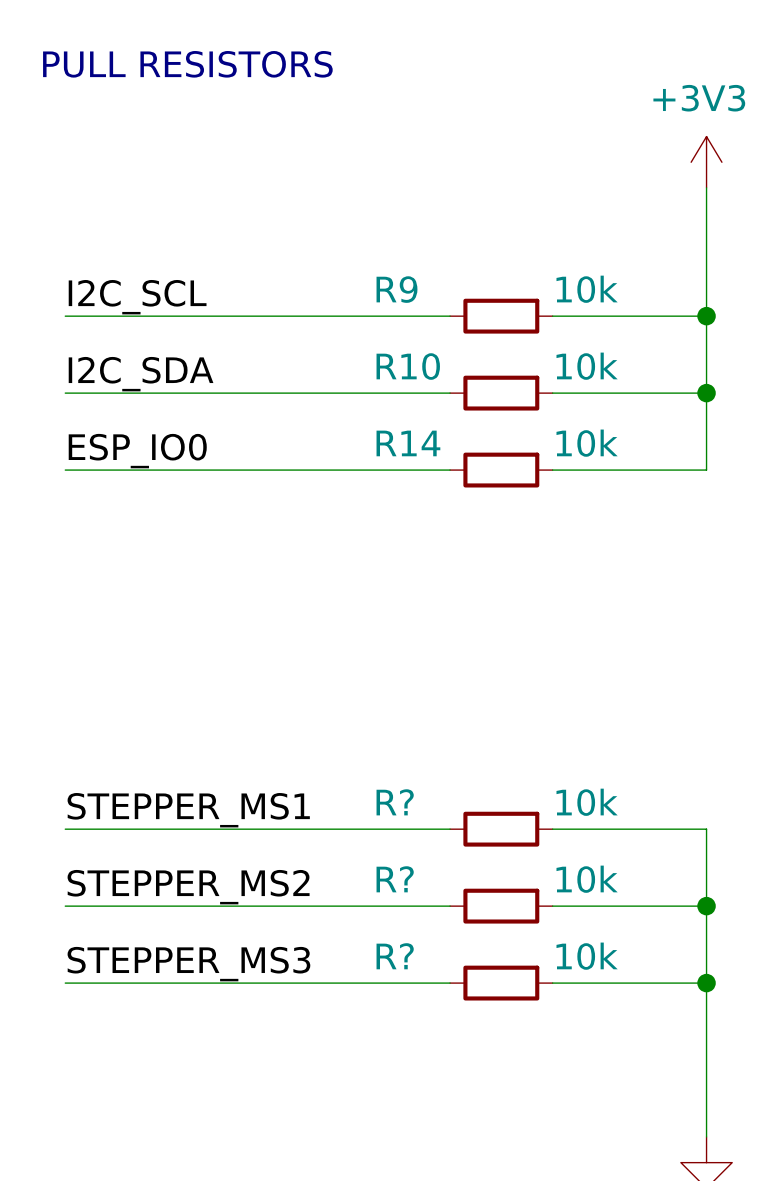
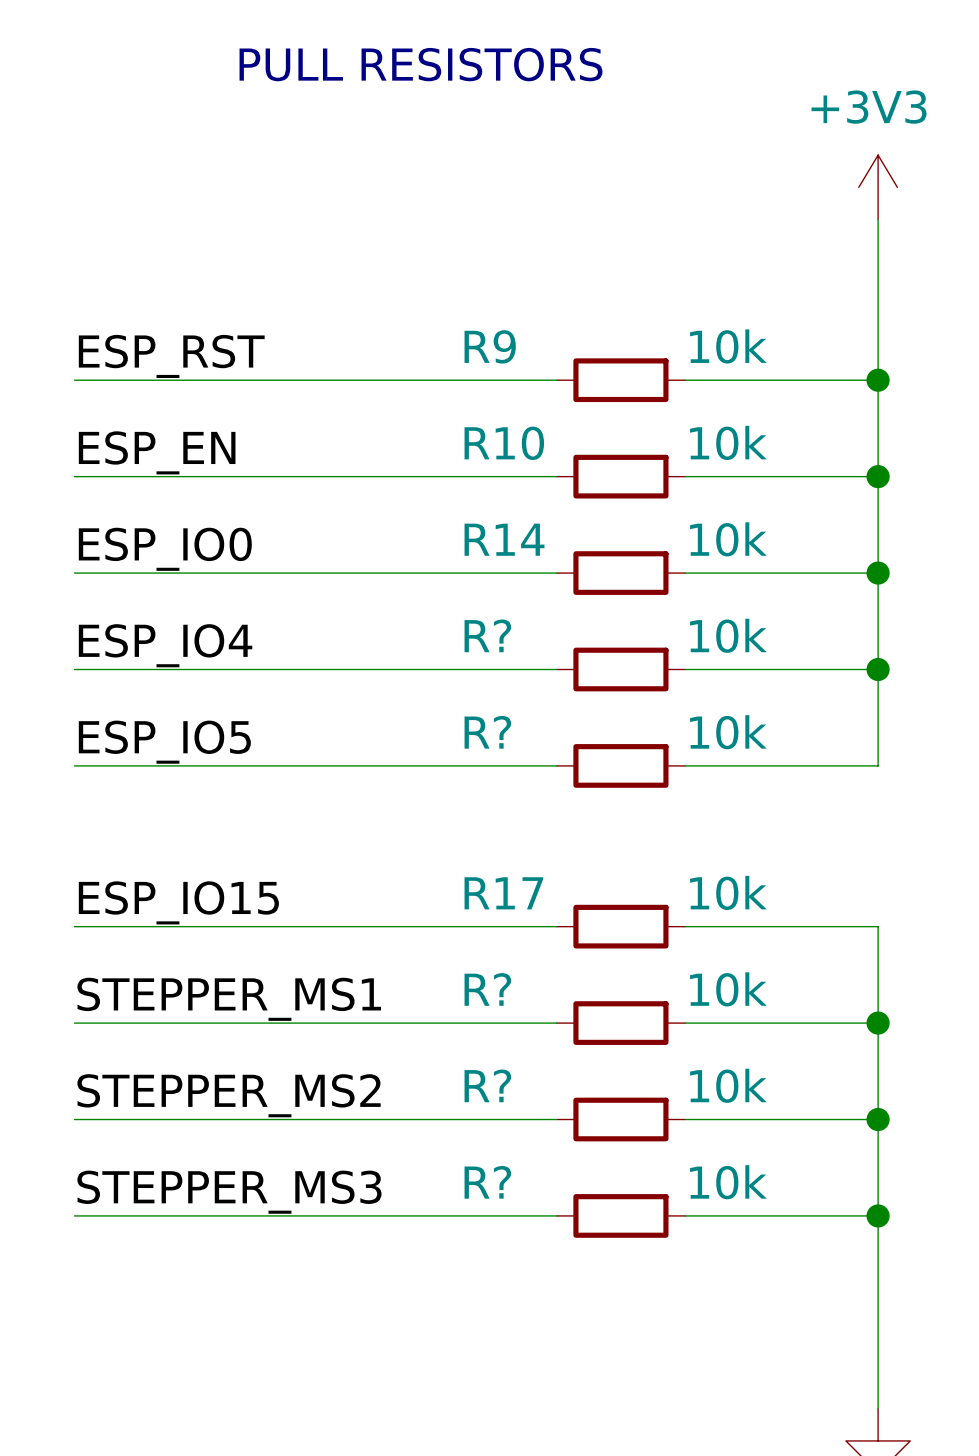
text position: PULL RESISTORS (187, 64) -> PULL RESISTORS (421, 64)
label: I2C_SCL (137, 297) -> ESP_RST (171, 356)
label: I2C_SDA (141, 374) -> ESP_EN (157, 452)
wire: none -> (878, 573) (878, 765) (685, 765)
junction: none -> (878, 573)
label: none -> ESP_IO4 (165, 645)
wire: none -> (74, 669) (556, 669)
R?: none -> 10k (620, 669)
wire: none -> (685, 669) (878, 669)
junction: none -> (878, 669)
label: none -> ESP_IO5 (164, 742)
wire: none -> (74, 765) (556, 765)
R?: none -> 10k (620, 765)
label: none -> ESP_IO15 (178, 902)
wire: none -> (74, 926) (556, 926)
R17: none -> 10k (620, 926)
wire: none -> (685, 926) (878, 926) (878, 1023)
junction: none -> (878, 1023)

